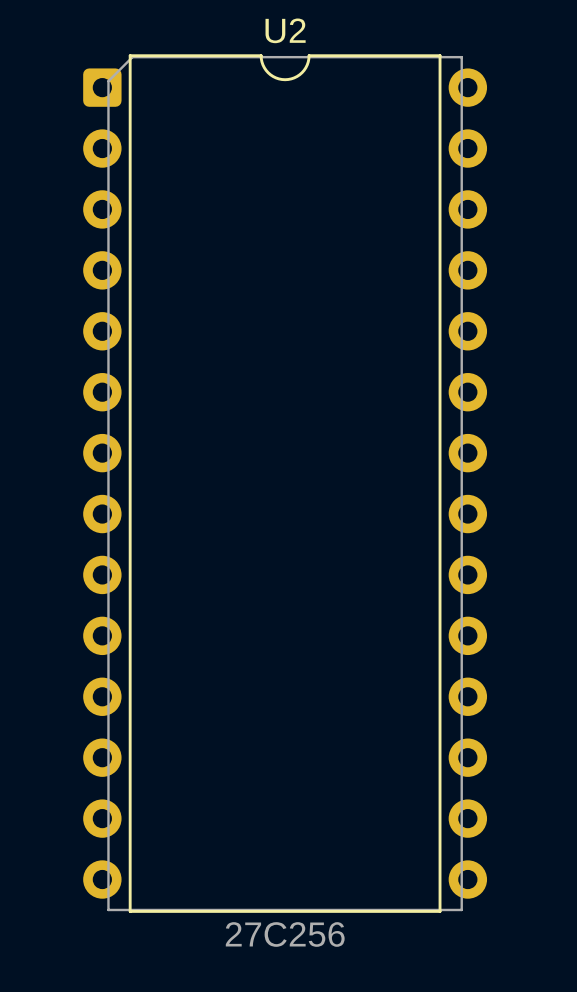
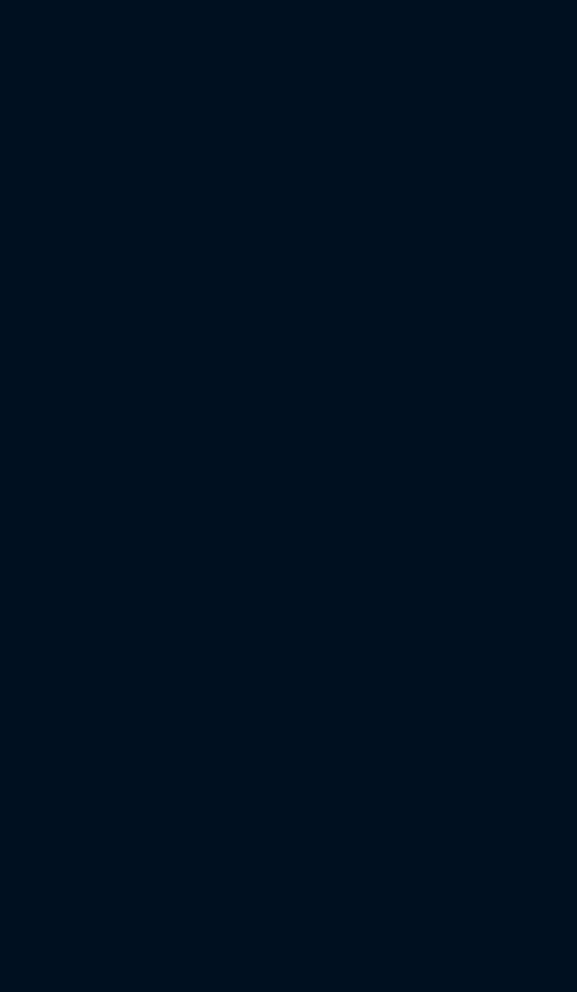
U2: 27C256 (285, 483) -> none

